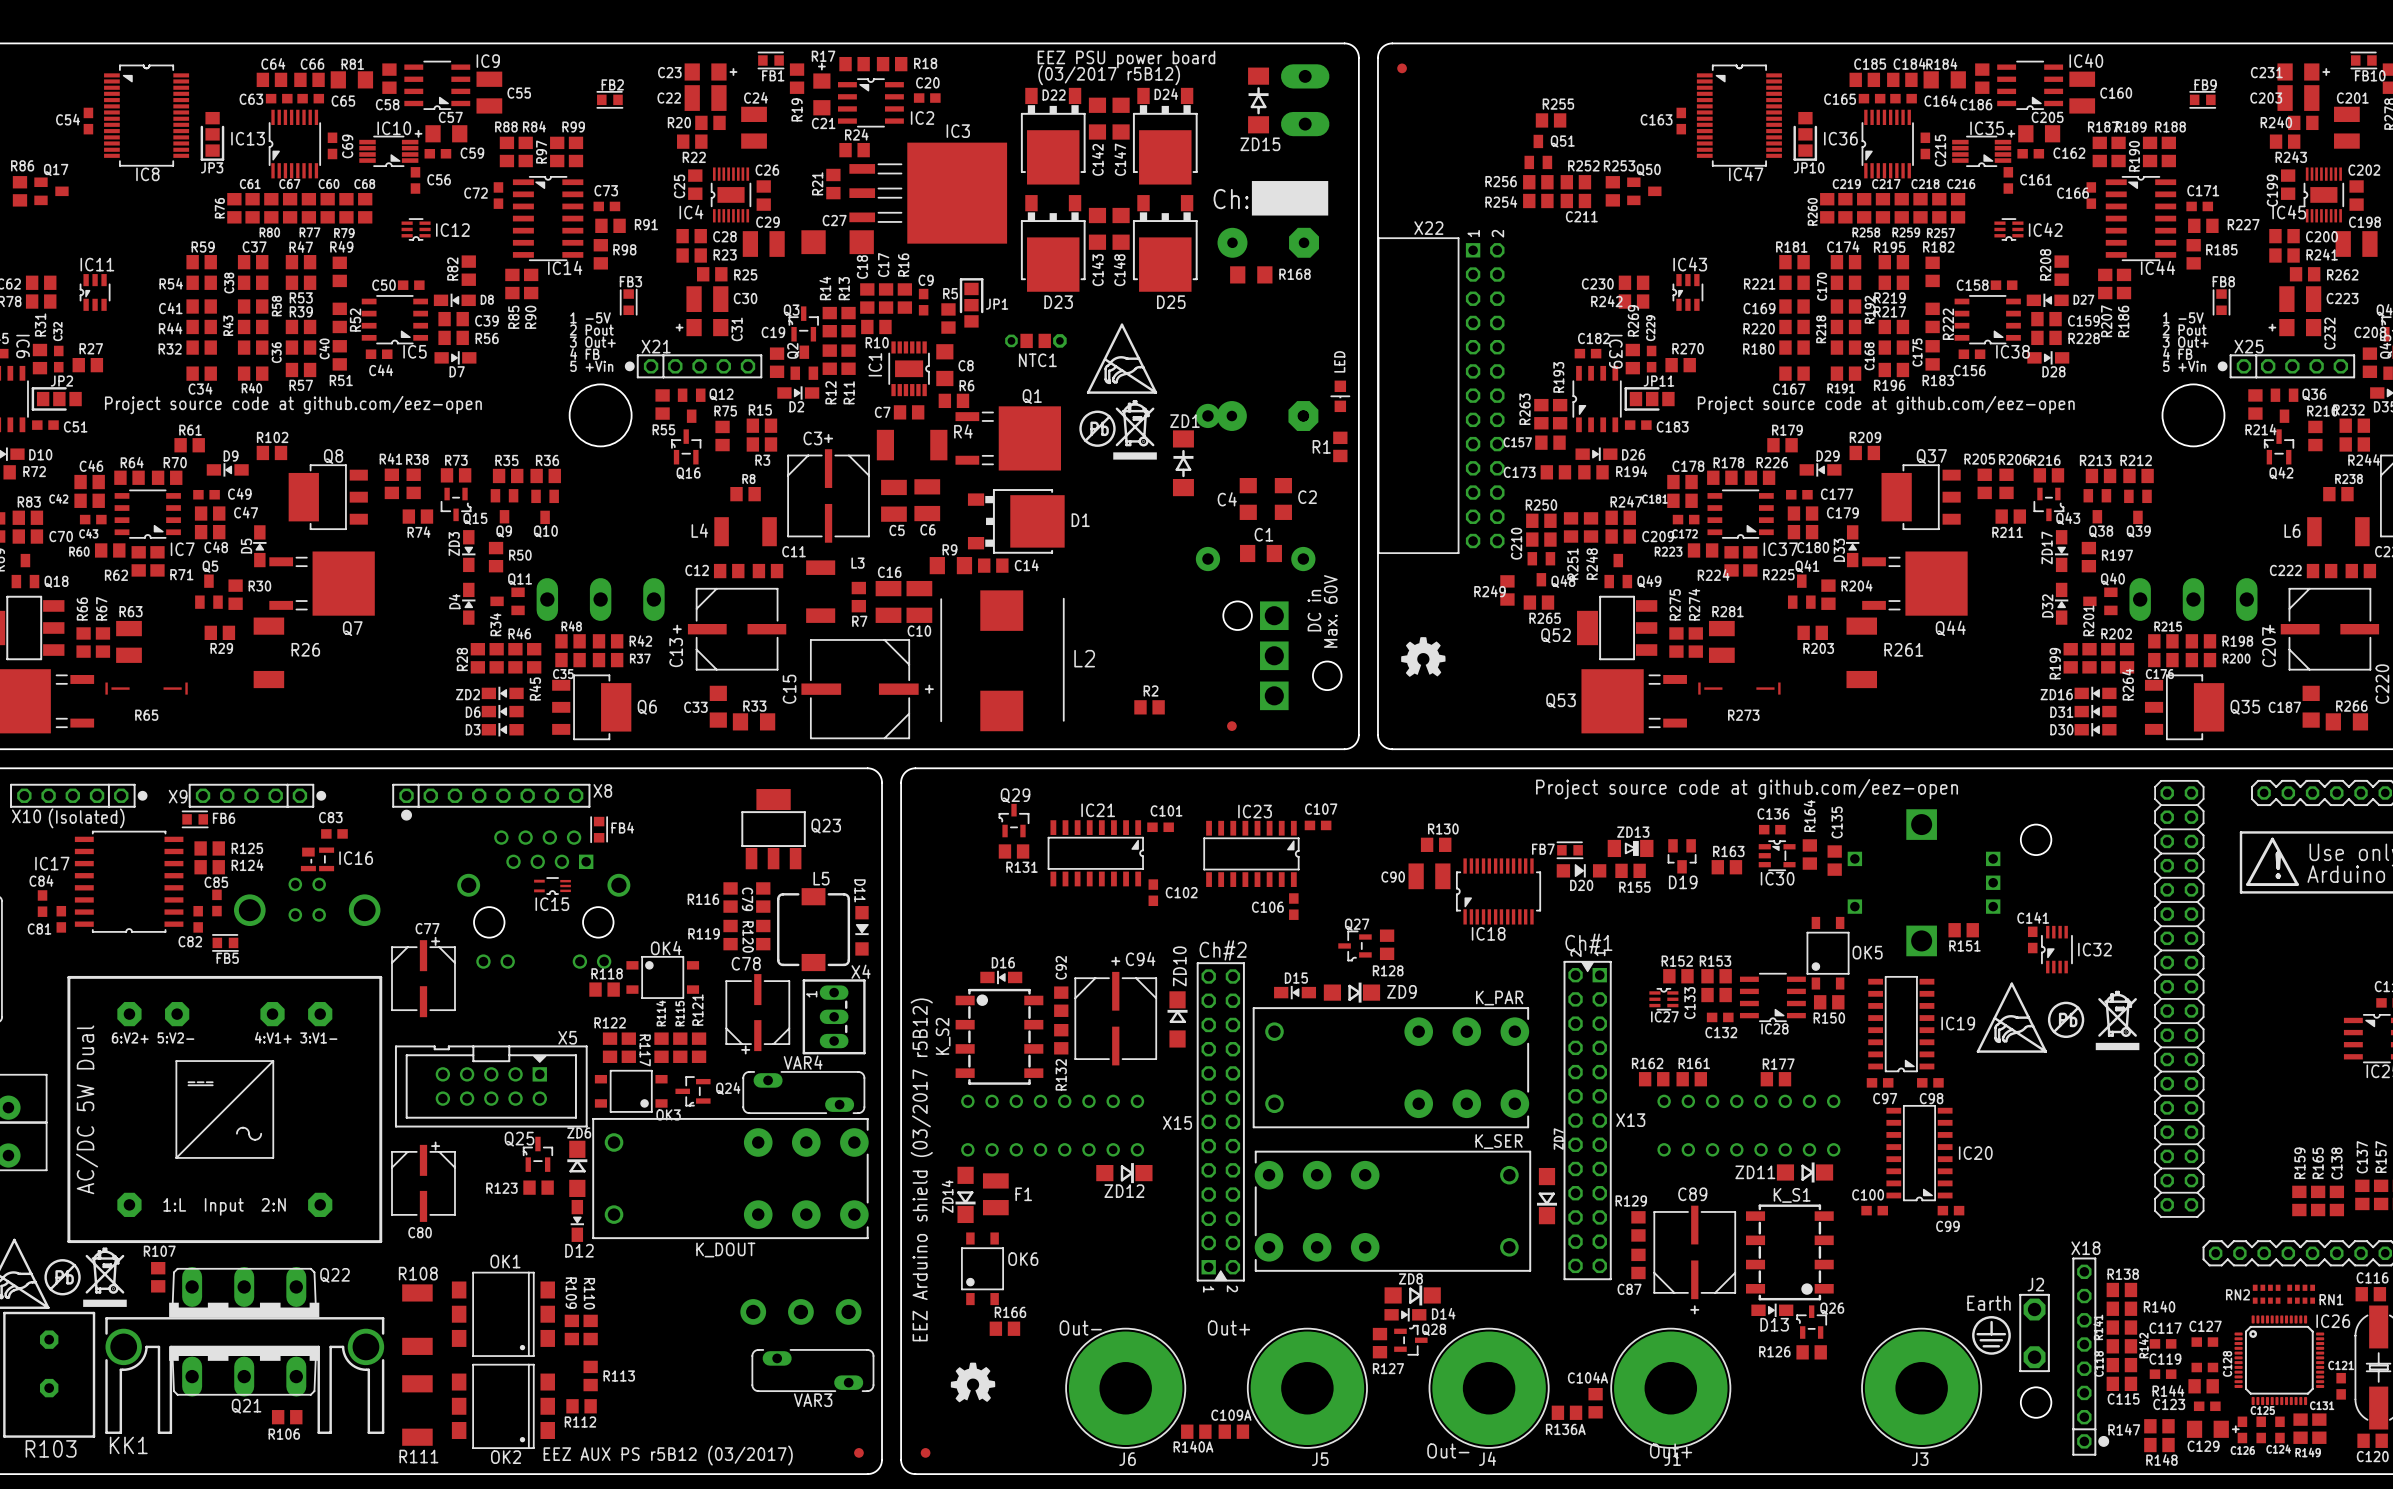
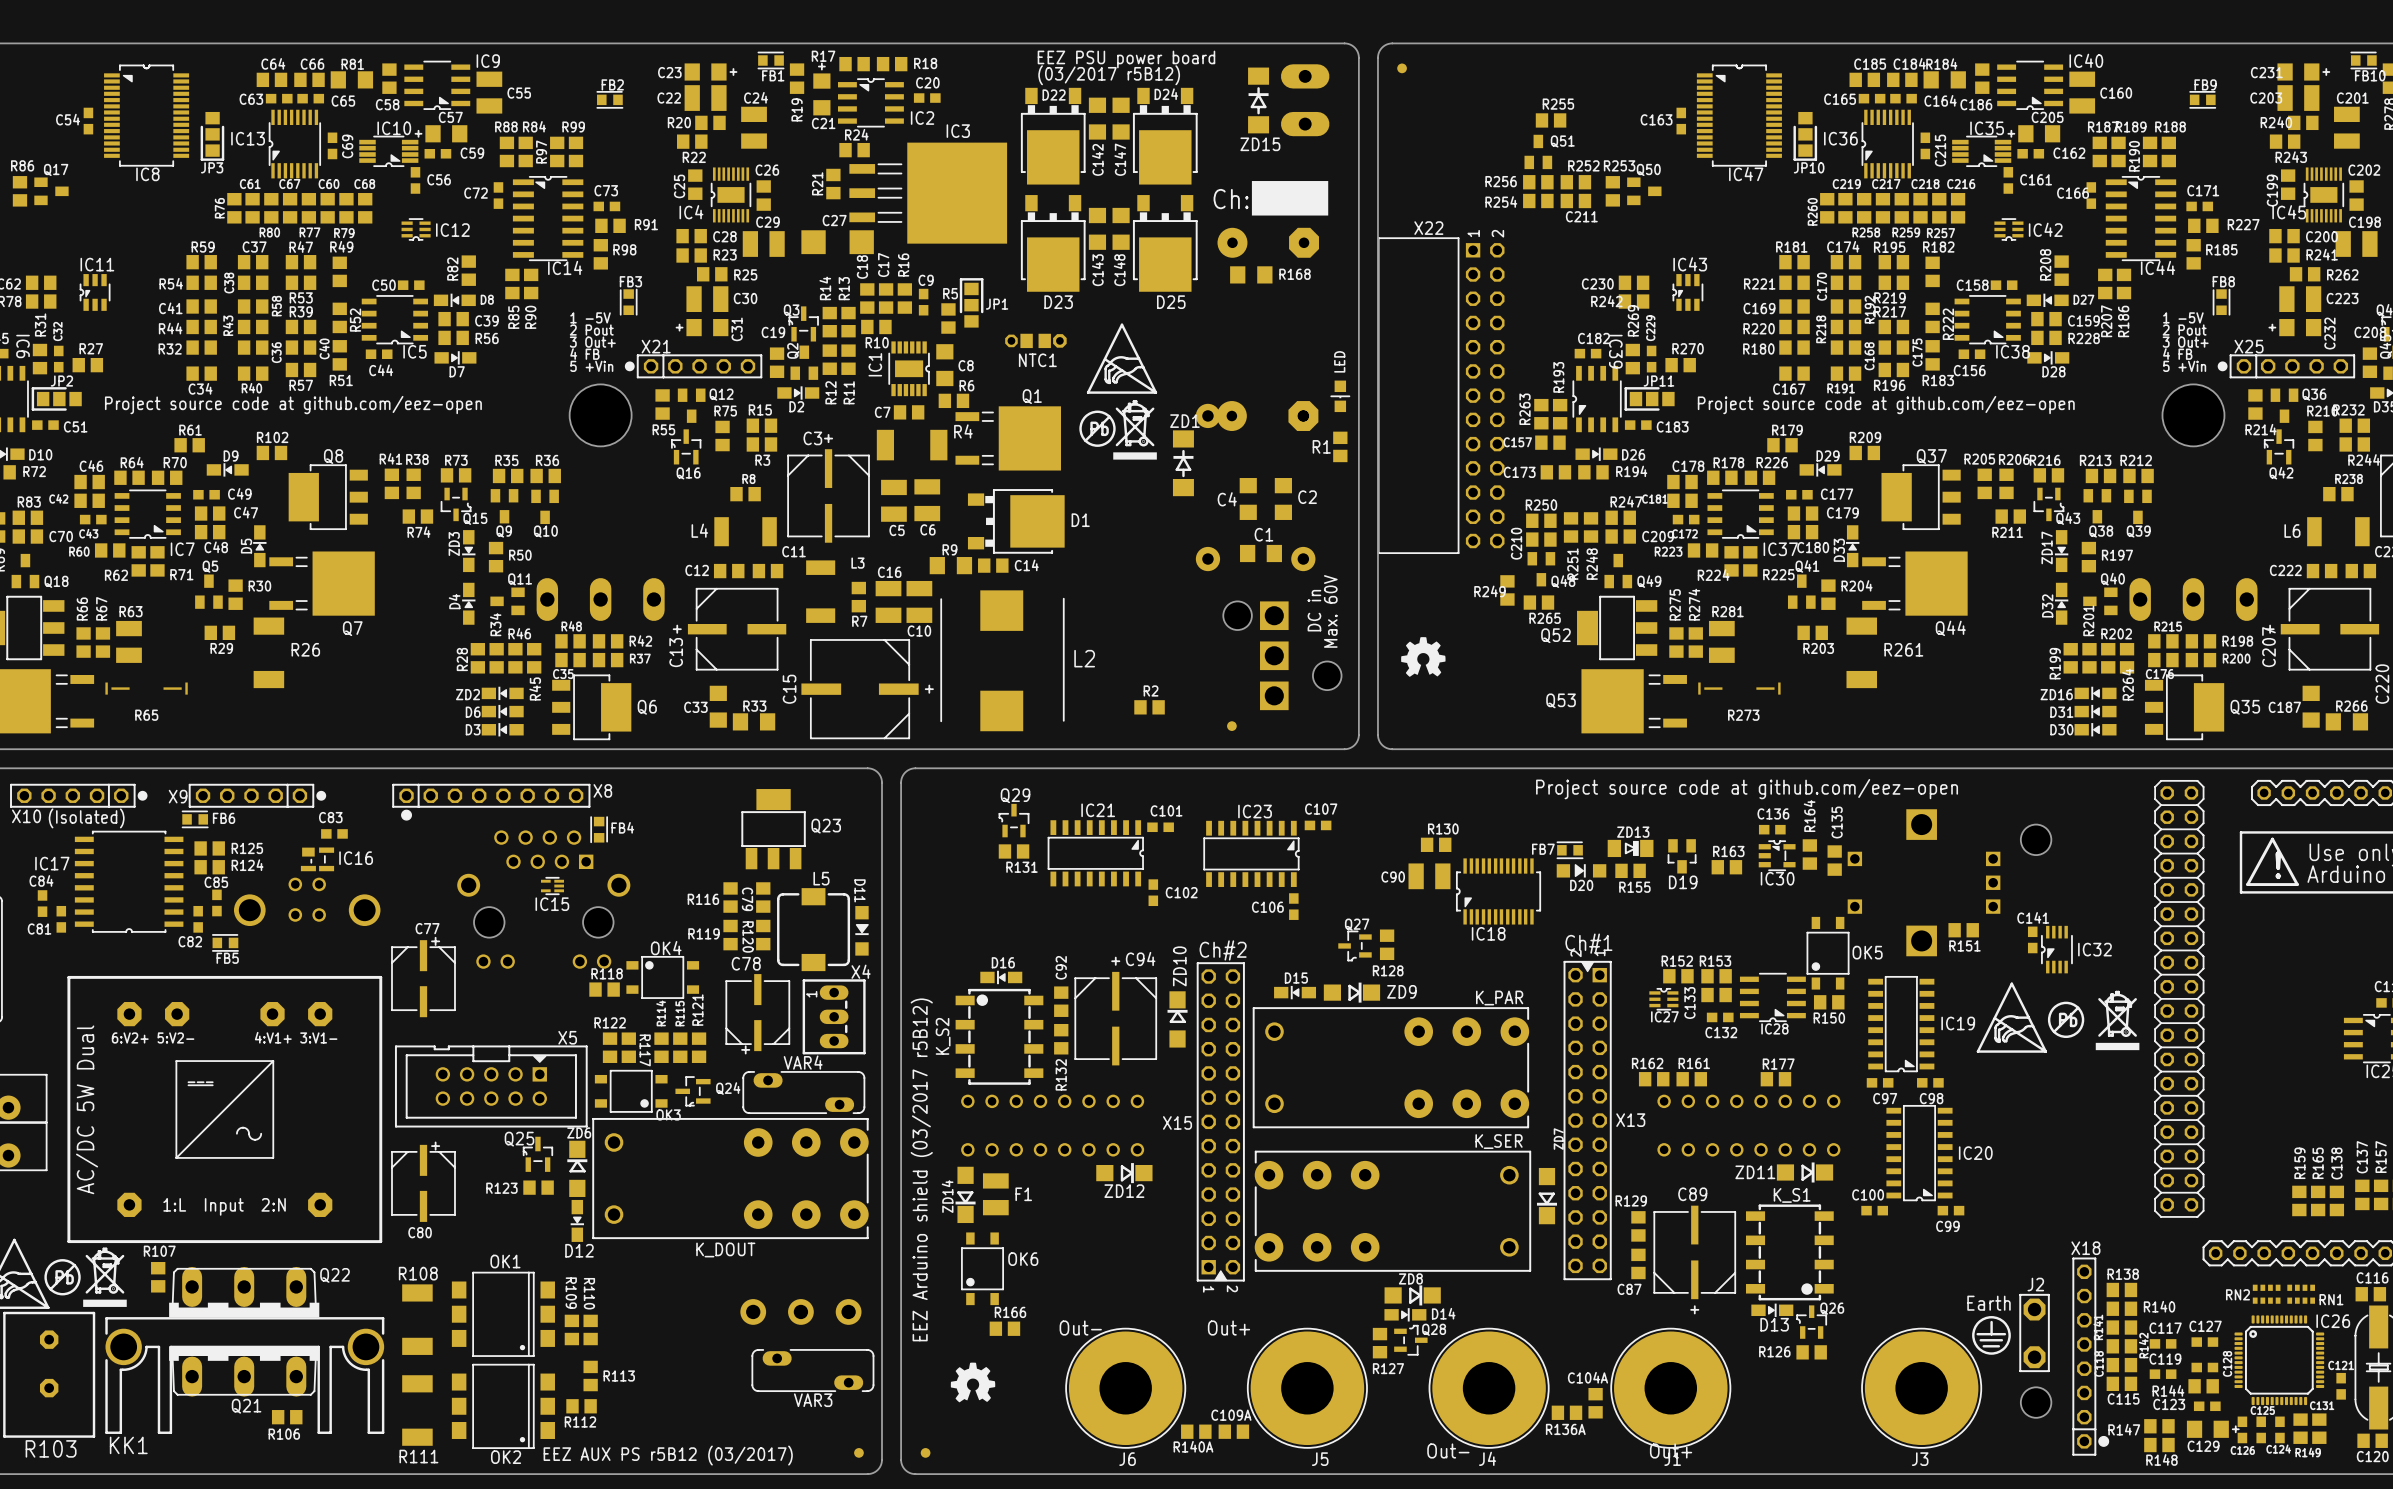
IC15 footprint: [534, 877, 571, 895] -> [540, 877, 565, 895]

